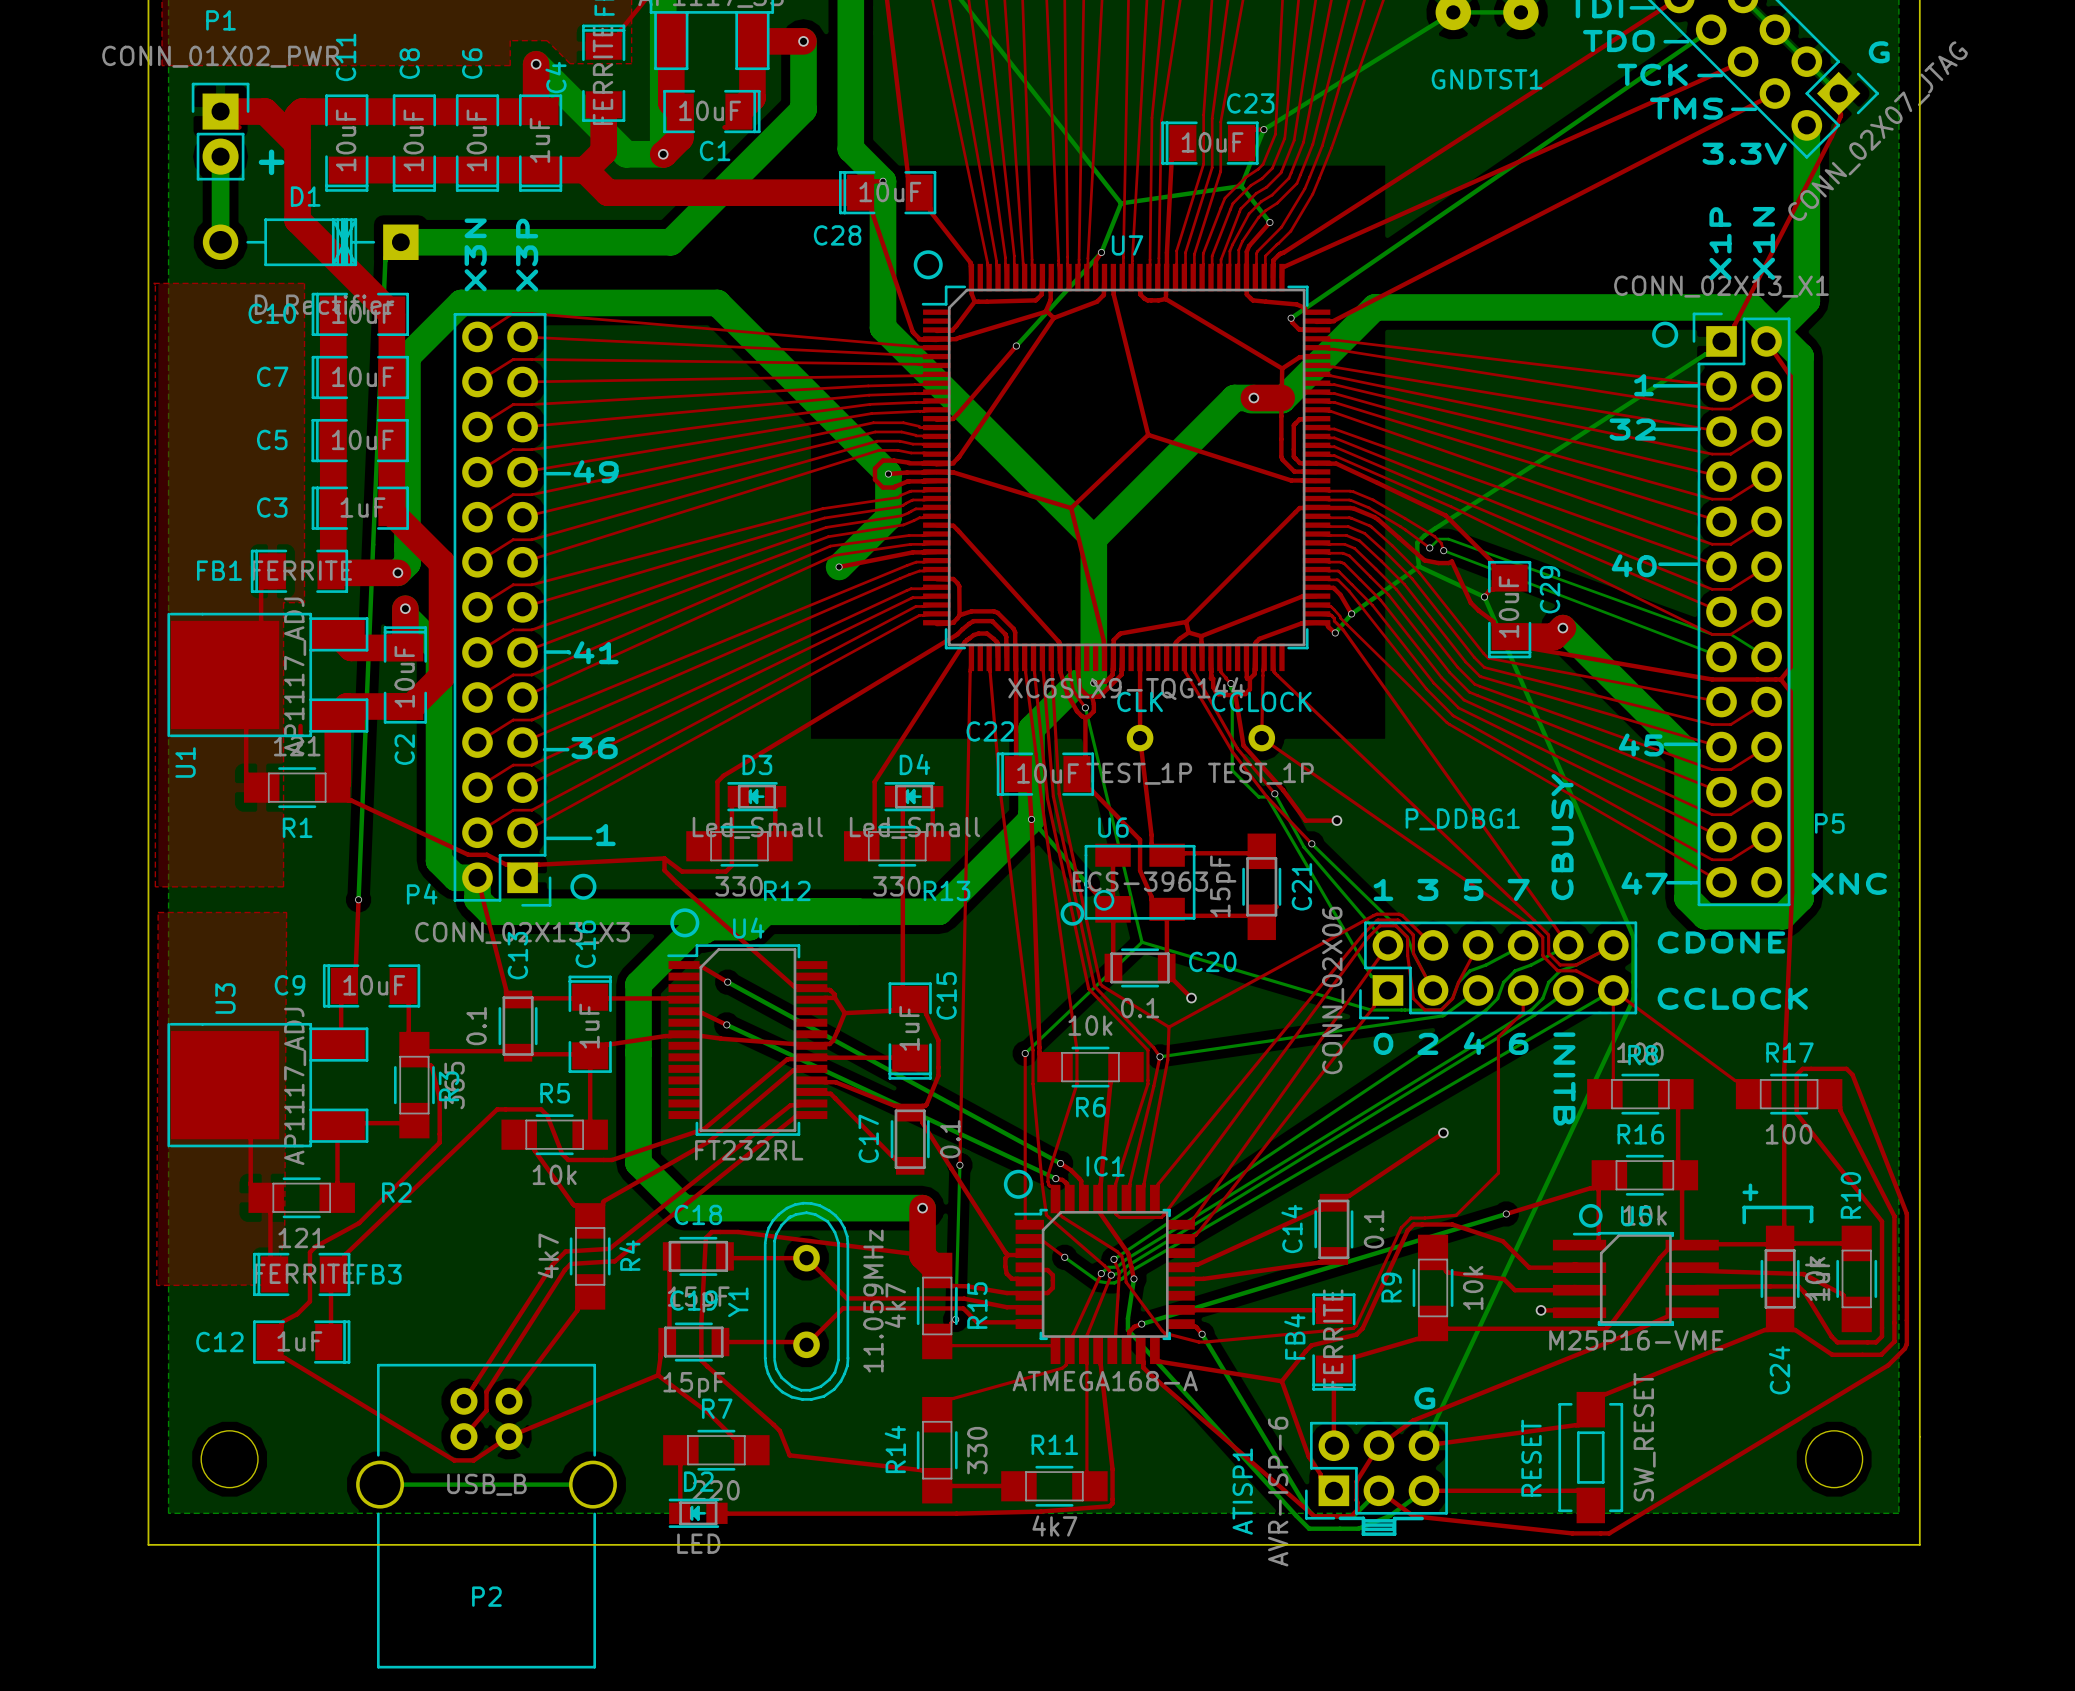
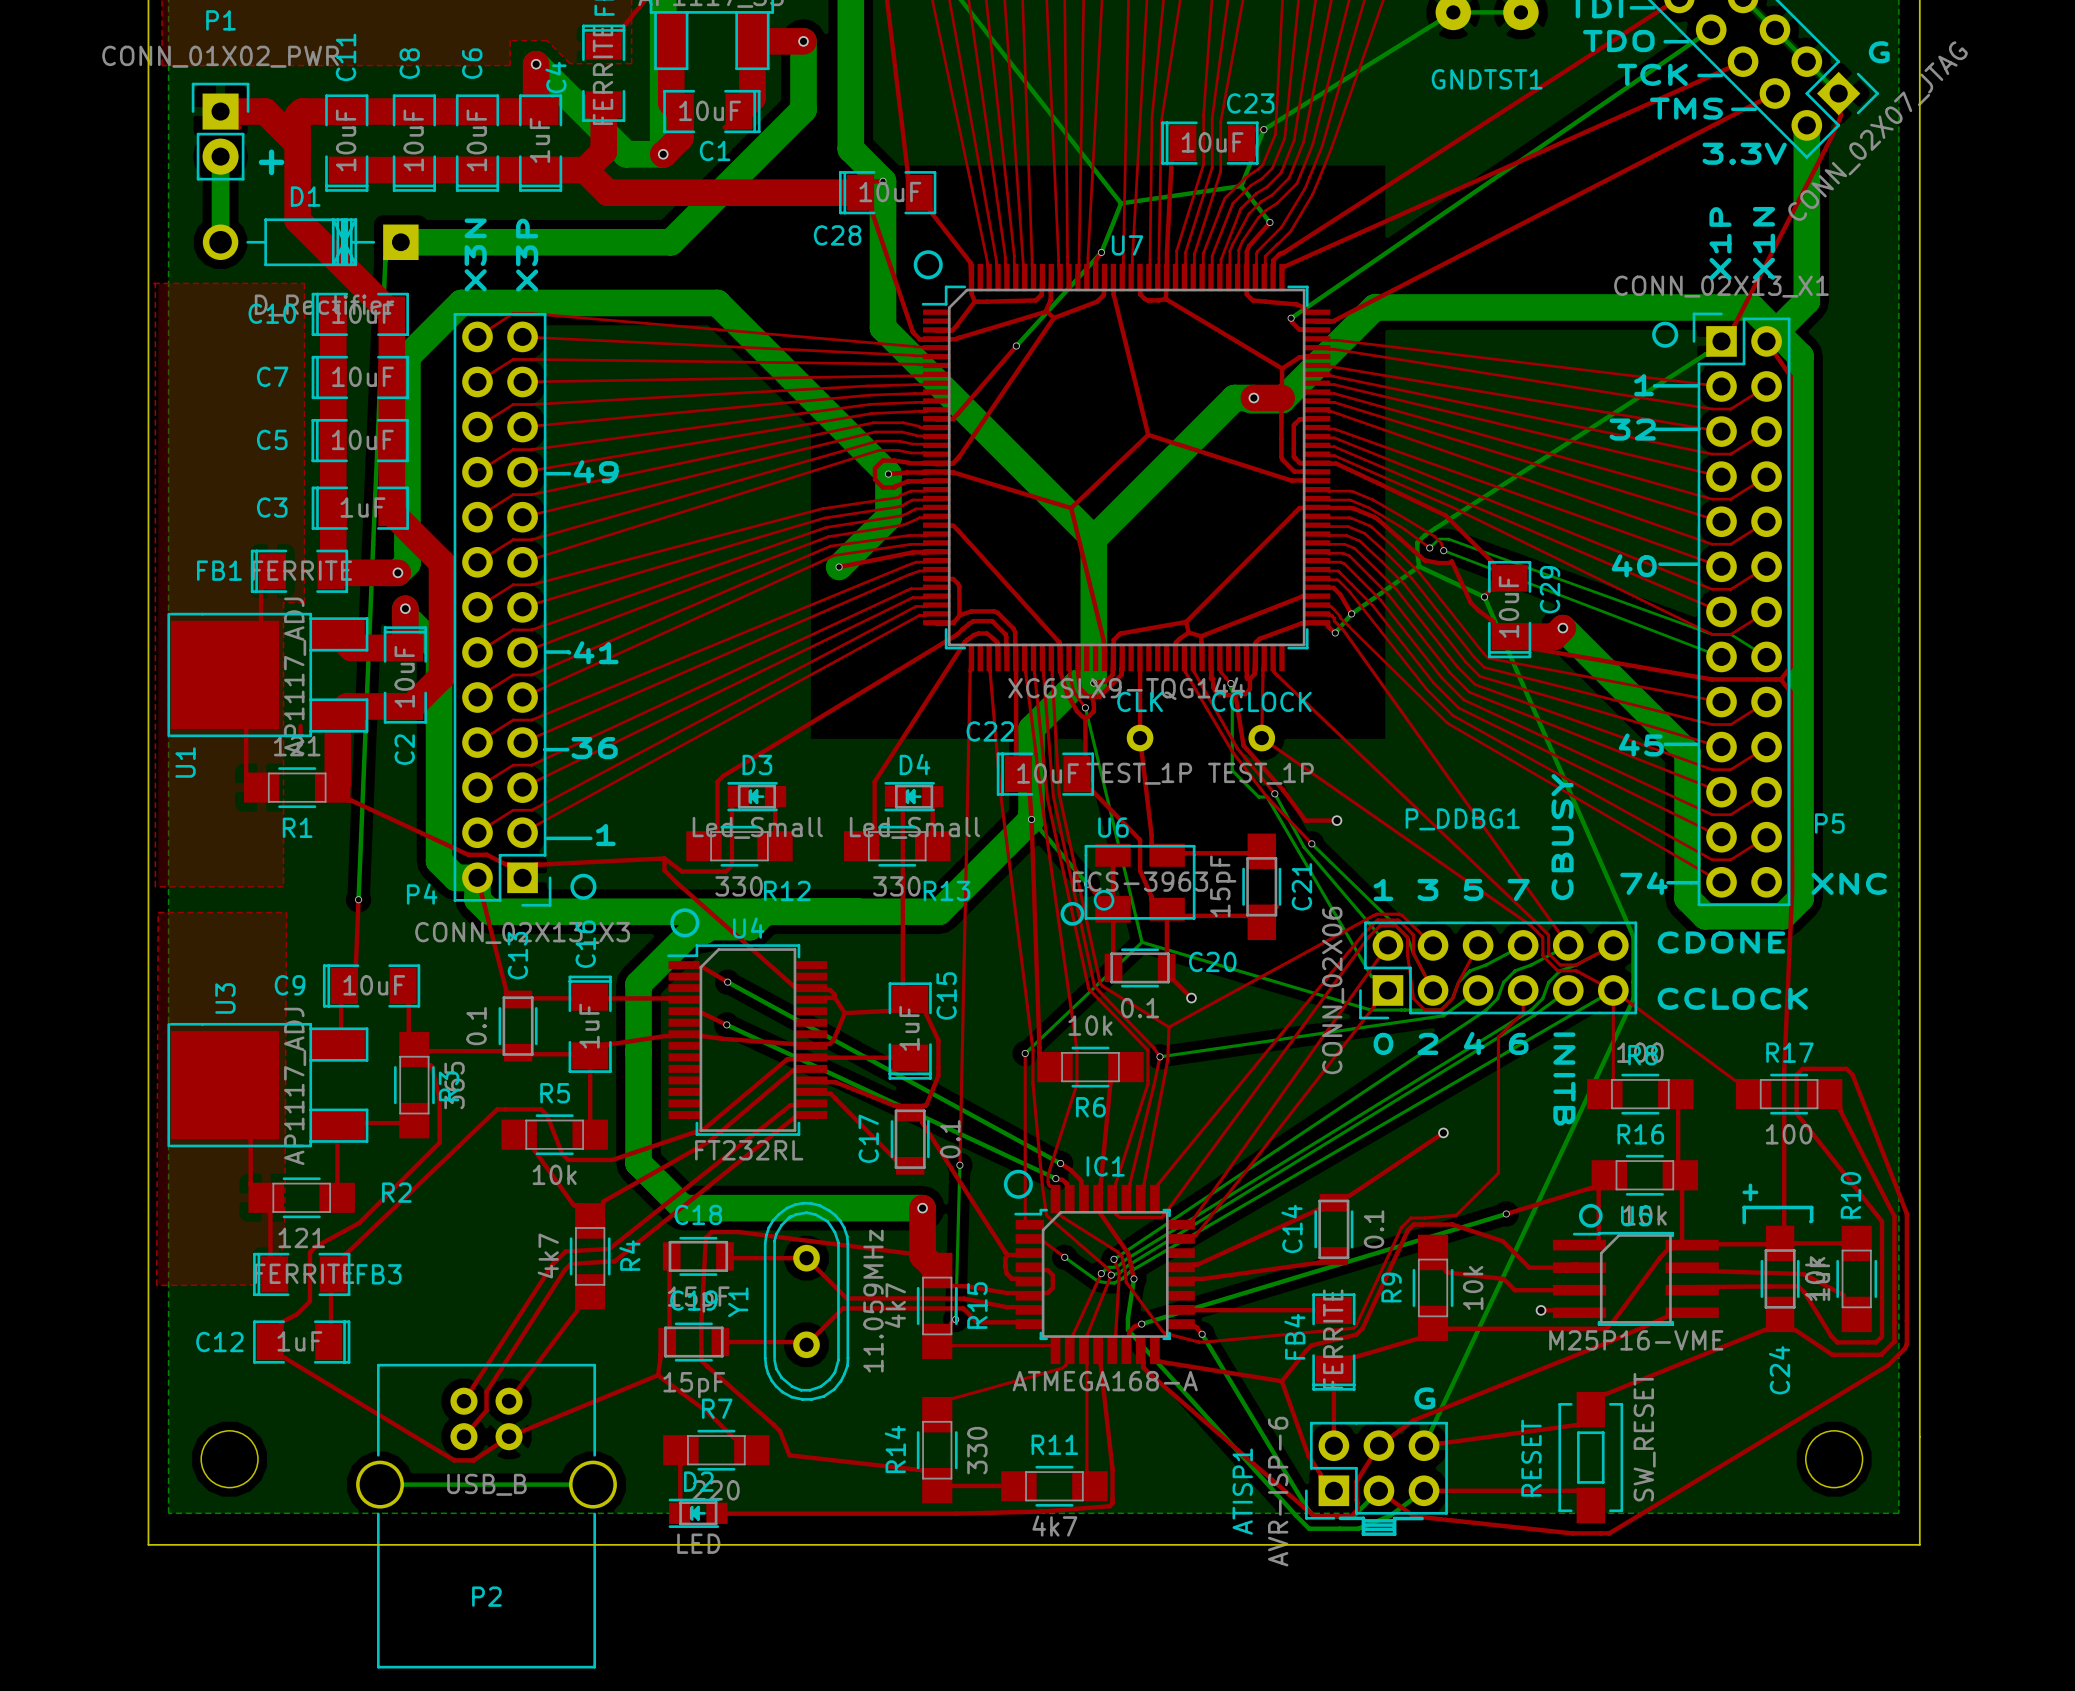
text: 47 (1644, 883) -> 74 (1643, 883)

